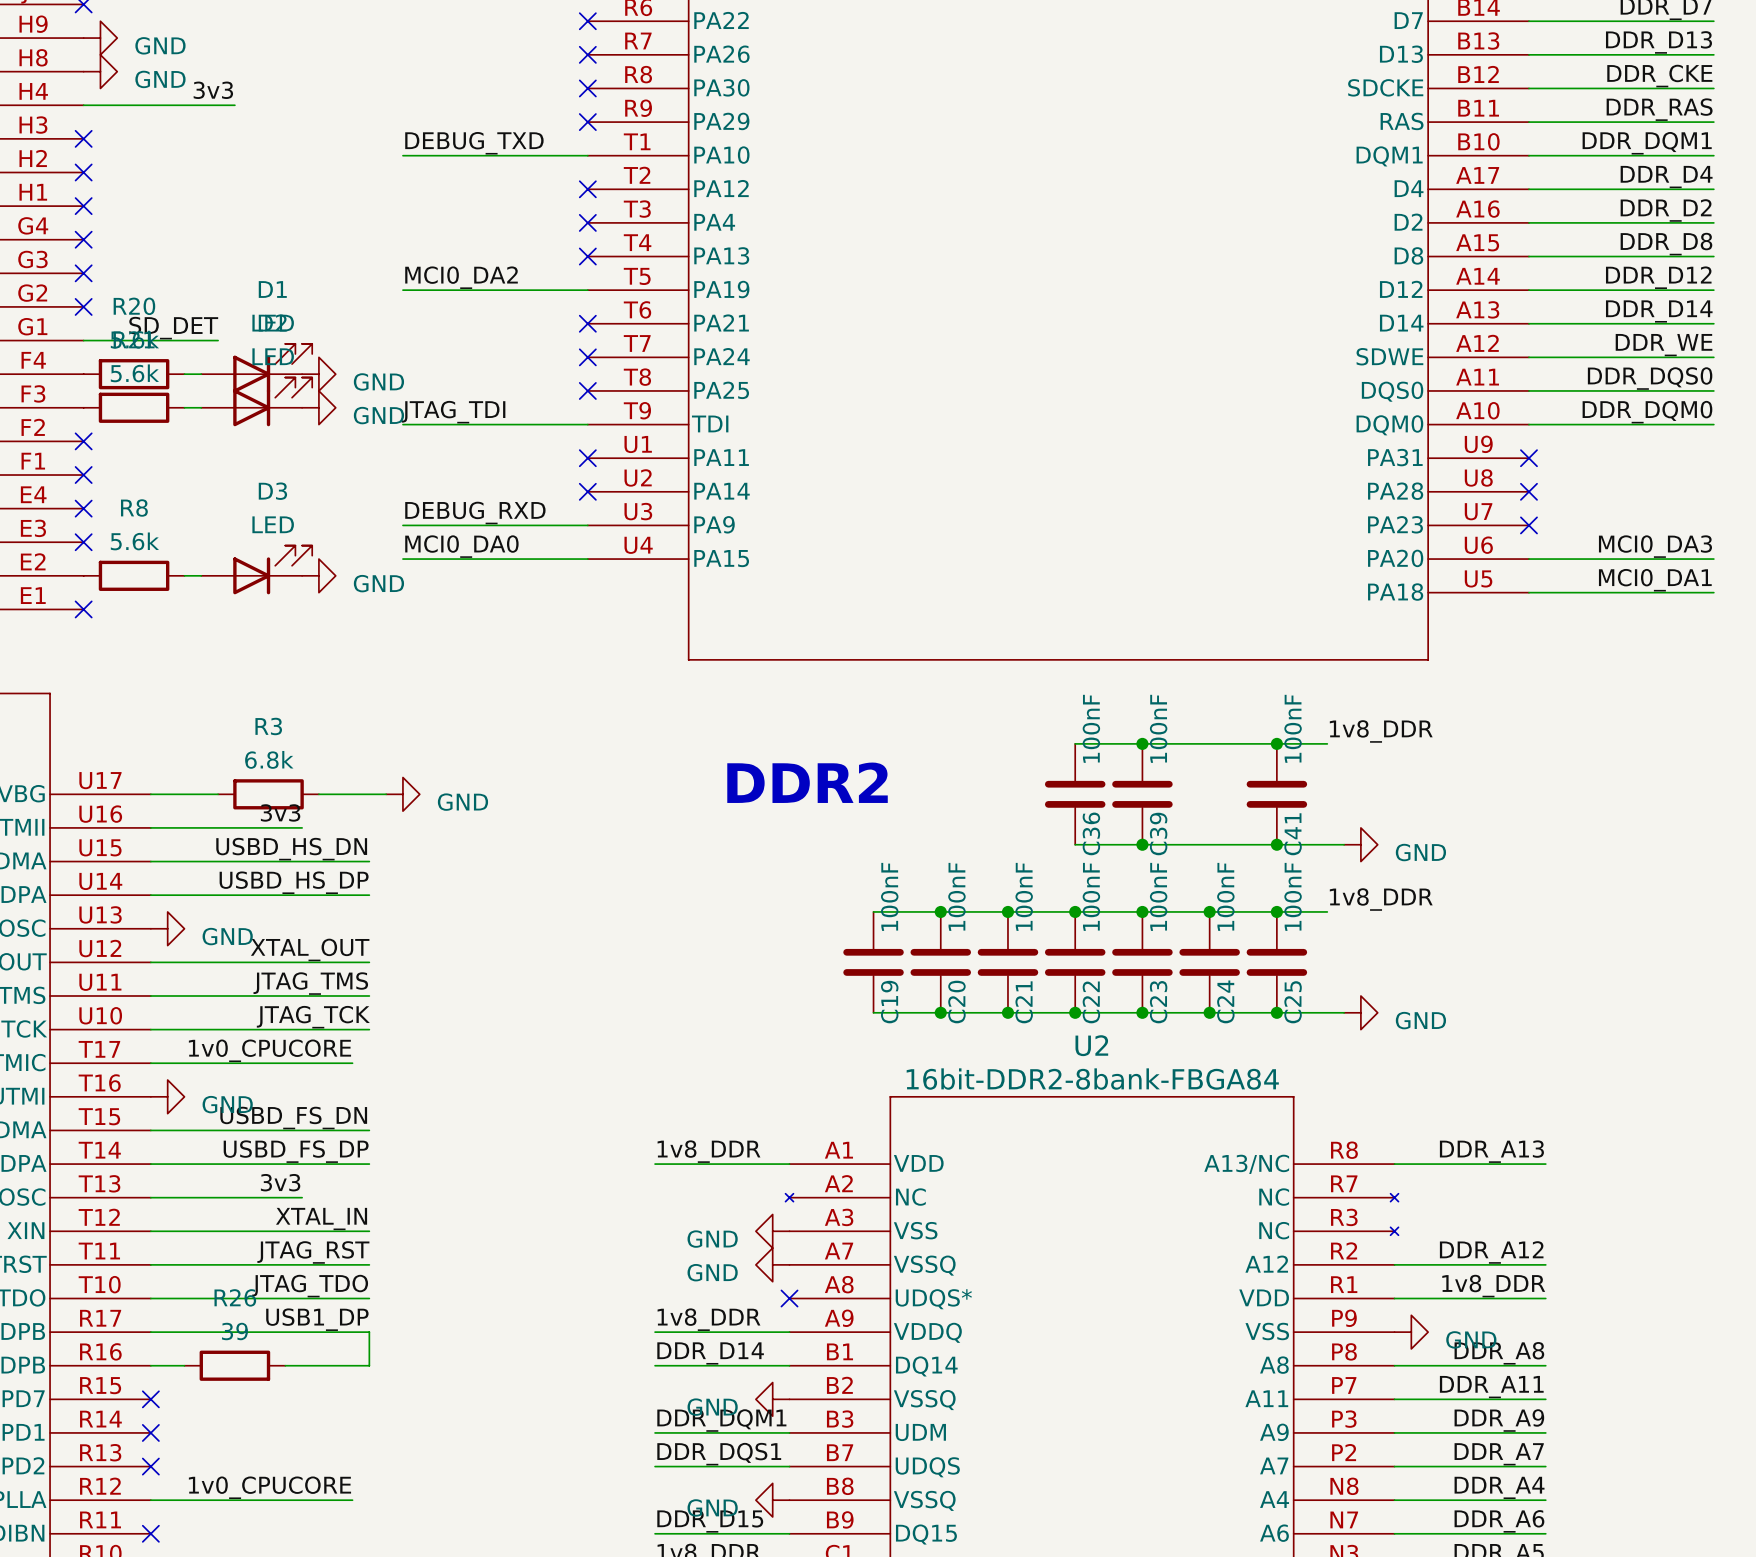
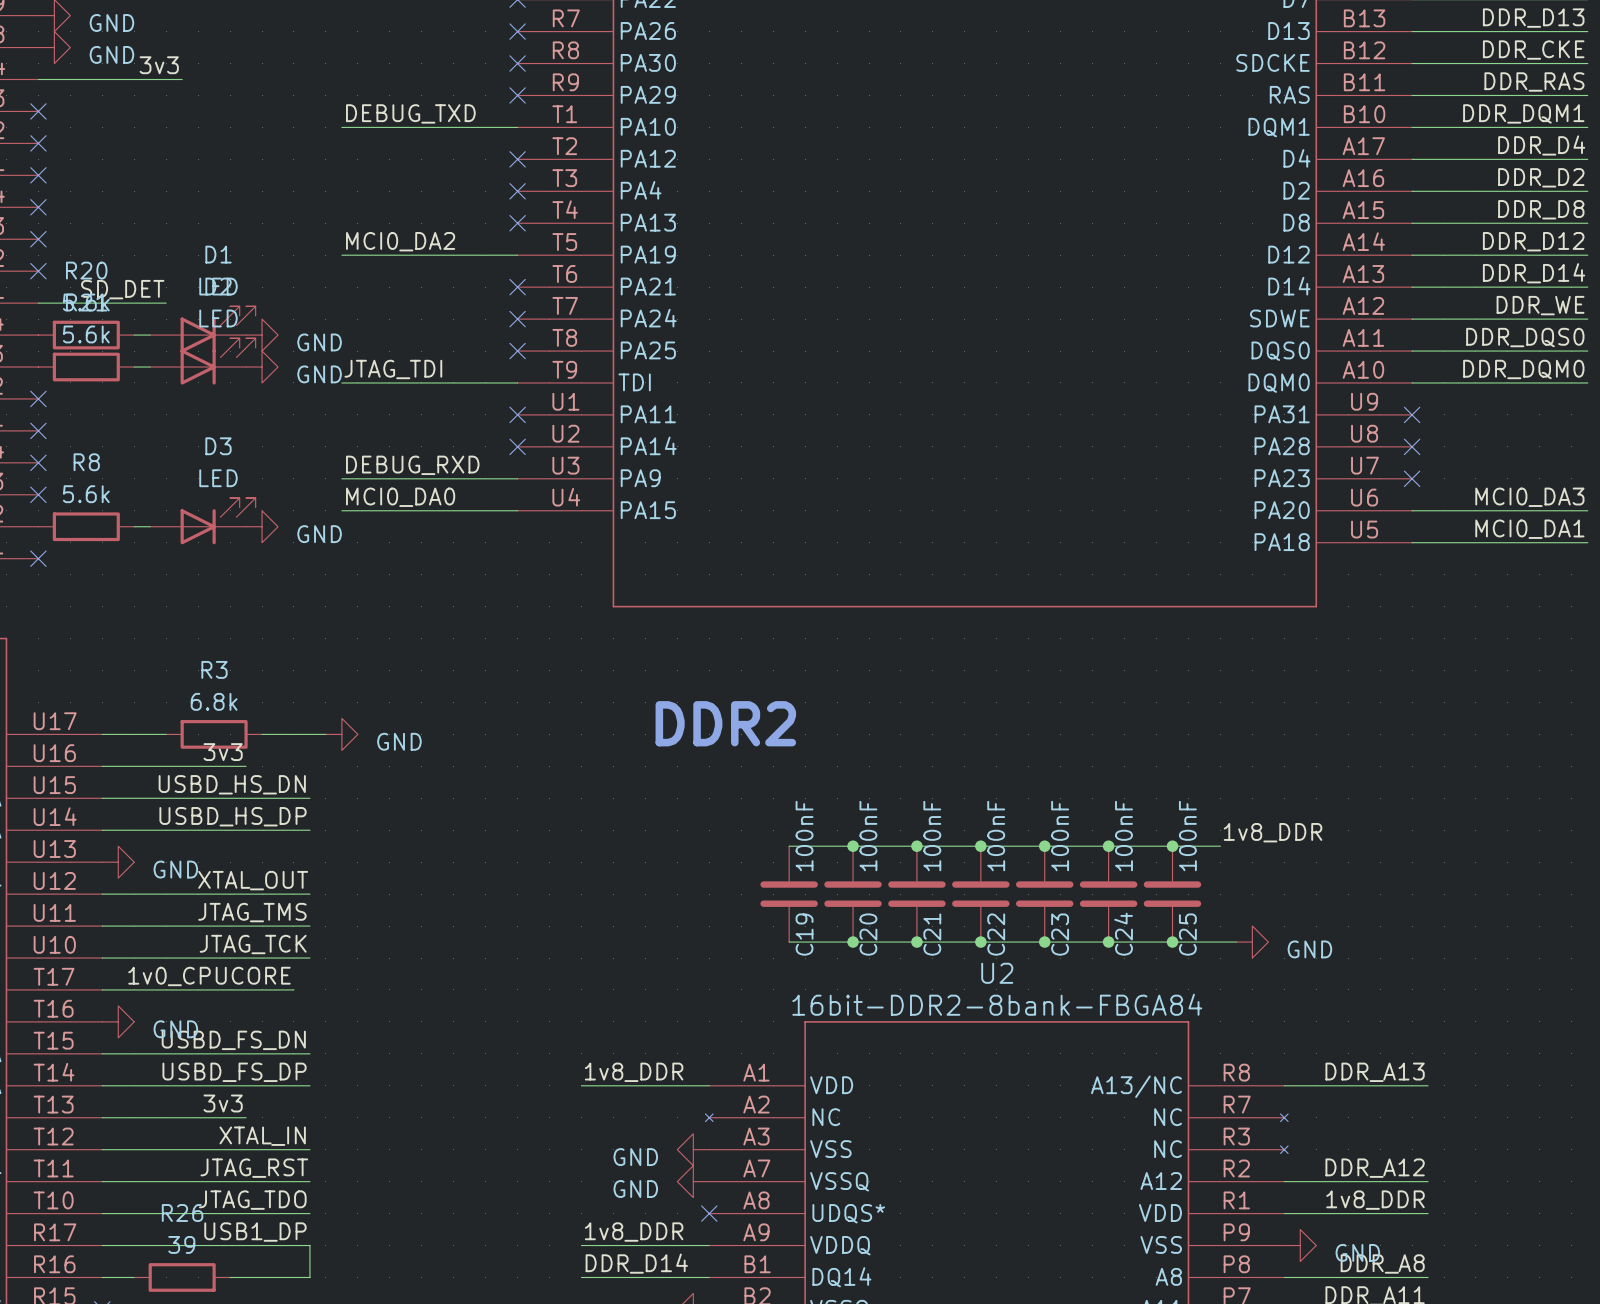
label: 1v8_DDR (1381, 731) -> none
wire: (1075, 743) (1327, 743) -> none
junction: (1142, 743) -> none
junction: (1276, 743) -> none
C36: 100nF (1075, 794) -> none
C39: 100nF (1142, 794) -> none
C41: 100nF (1276, 794) -> none
wire: (1075, 844) (1344, 844) -> none
junction: (1142, 844) -> none
junction: (1276, 844) -> none
power symbol: GND (1360, 844) -> none

